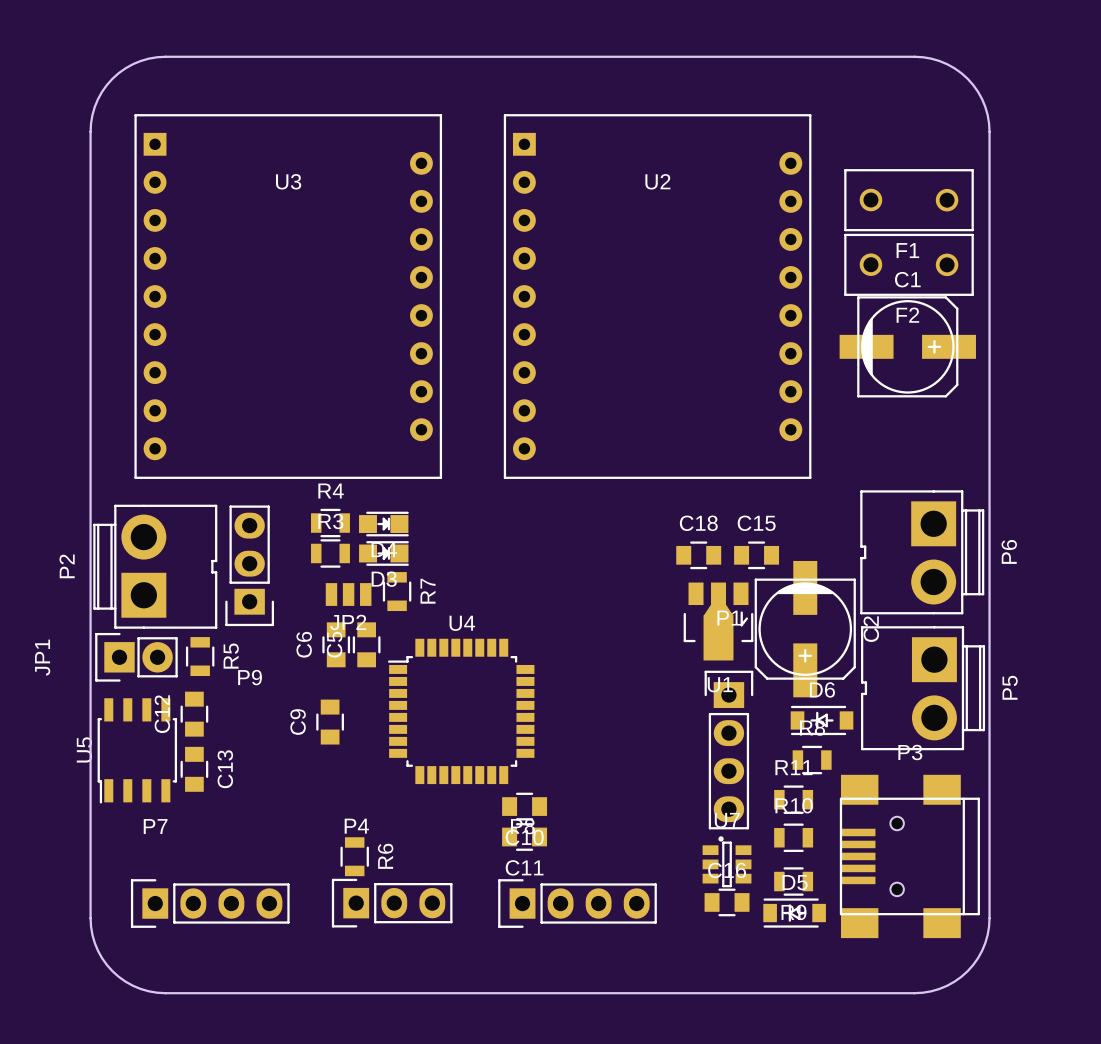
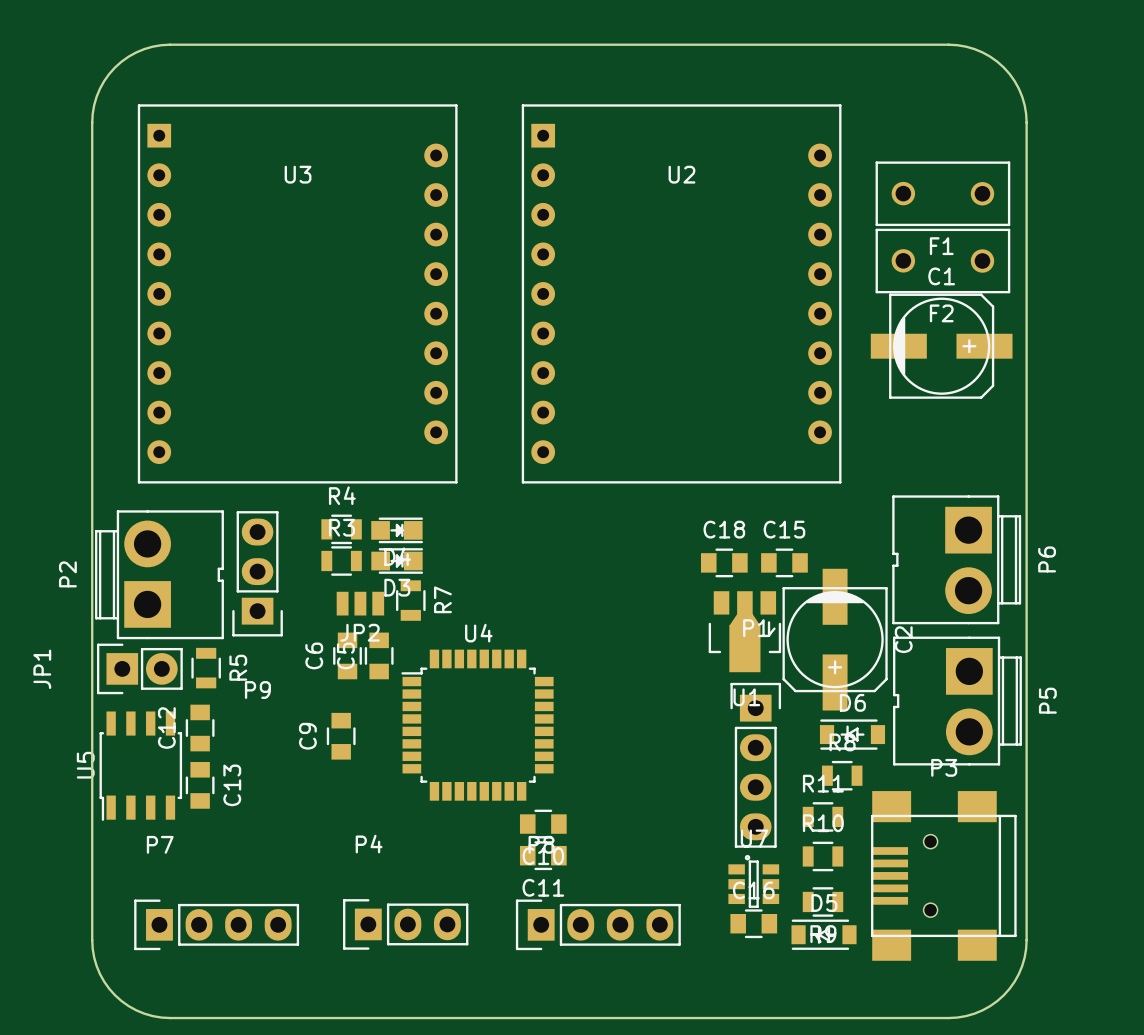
R6: (354, 856) -> none

